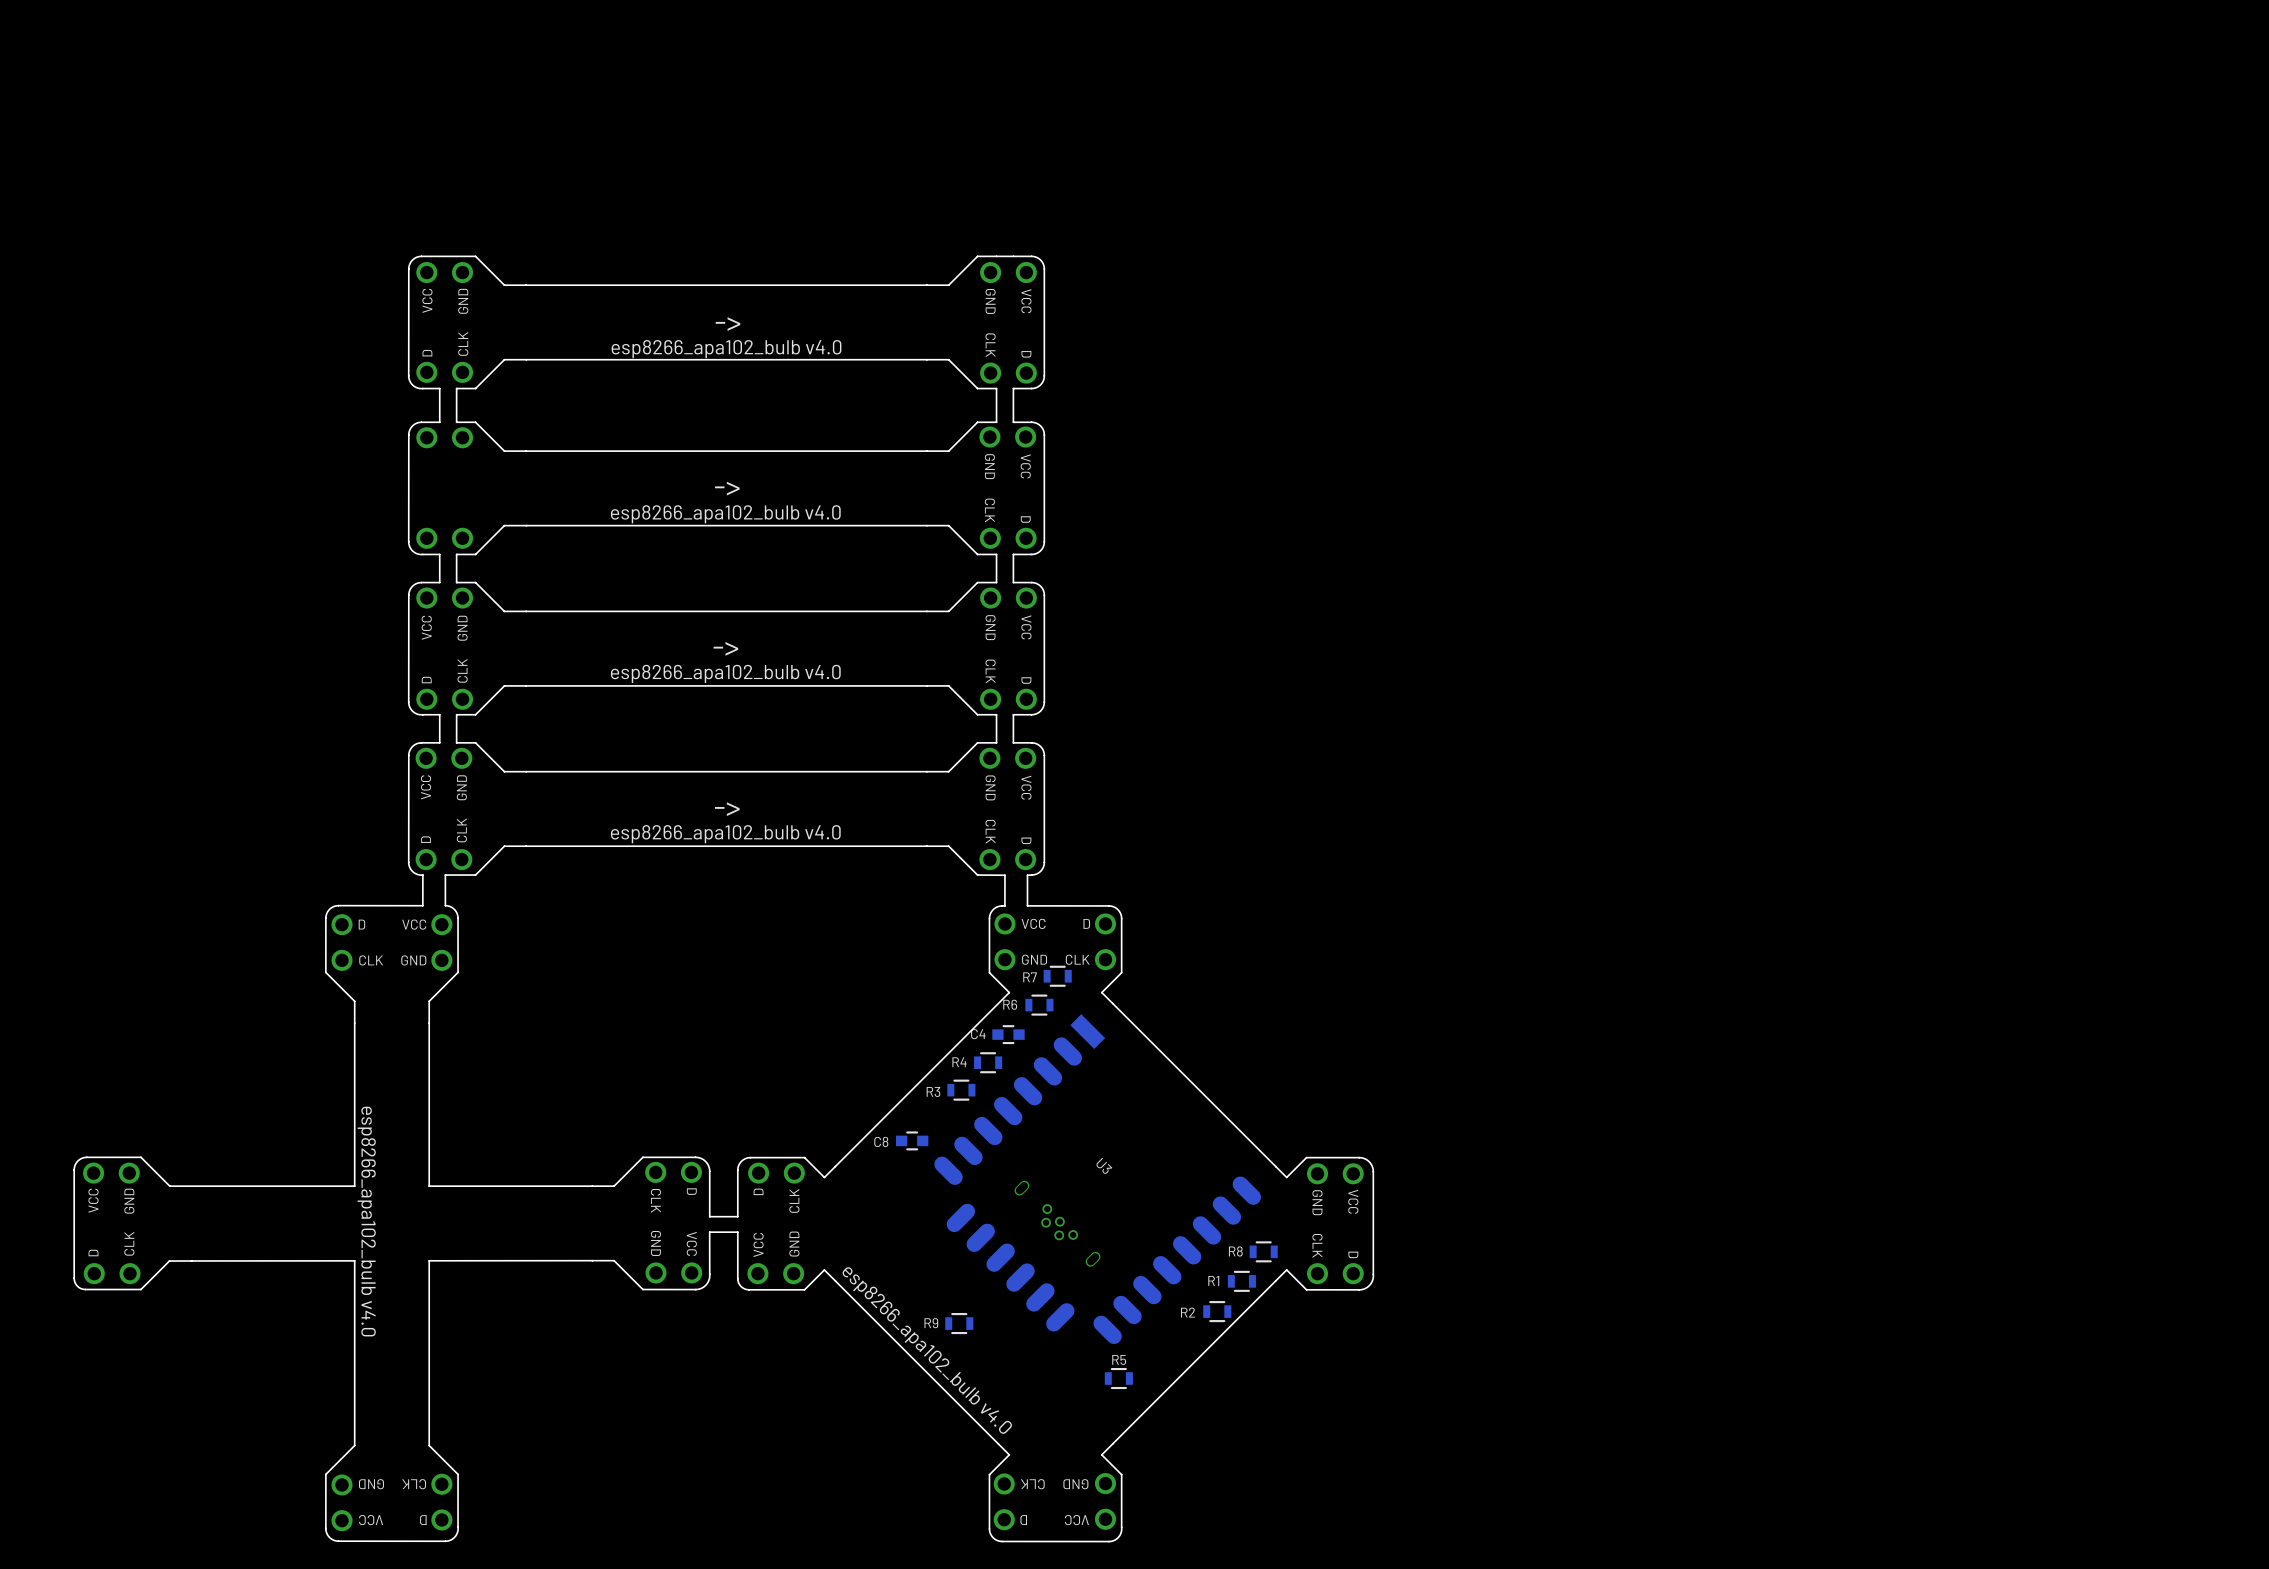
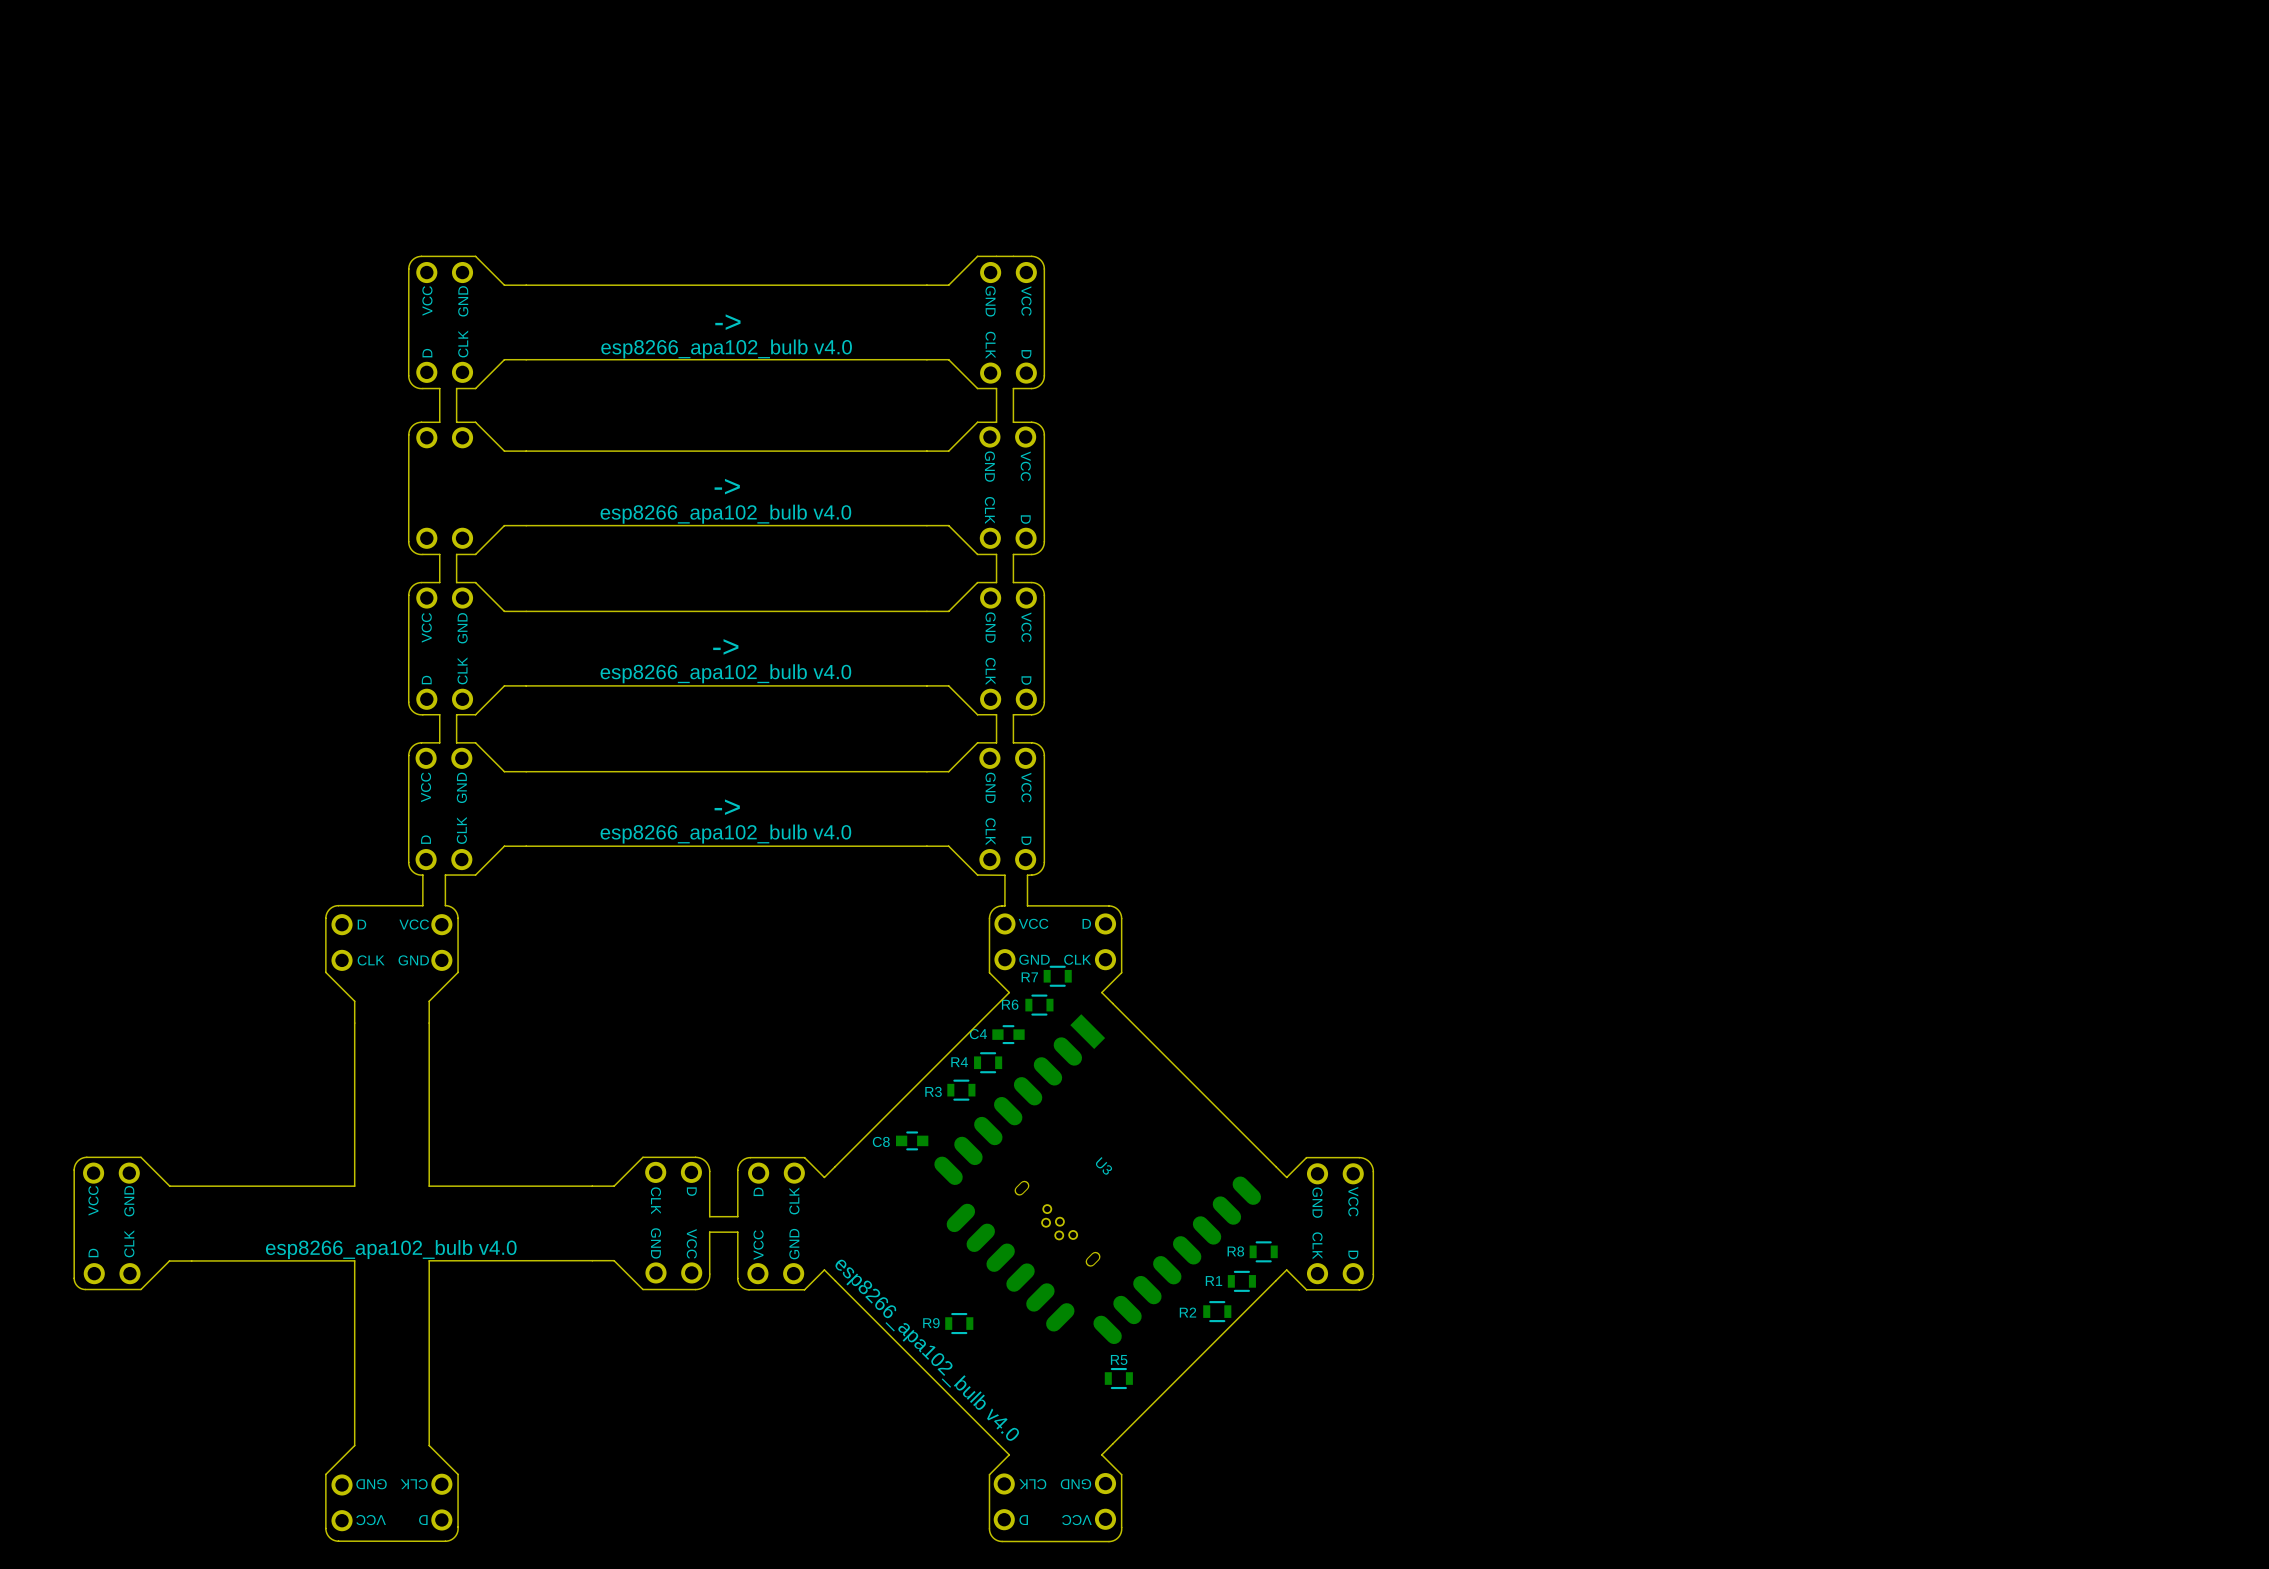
text rotation: 0° (366, 1221) -> 90° counterclockwise (391, 1249)

